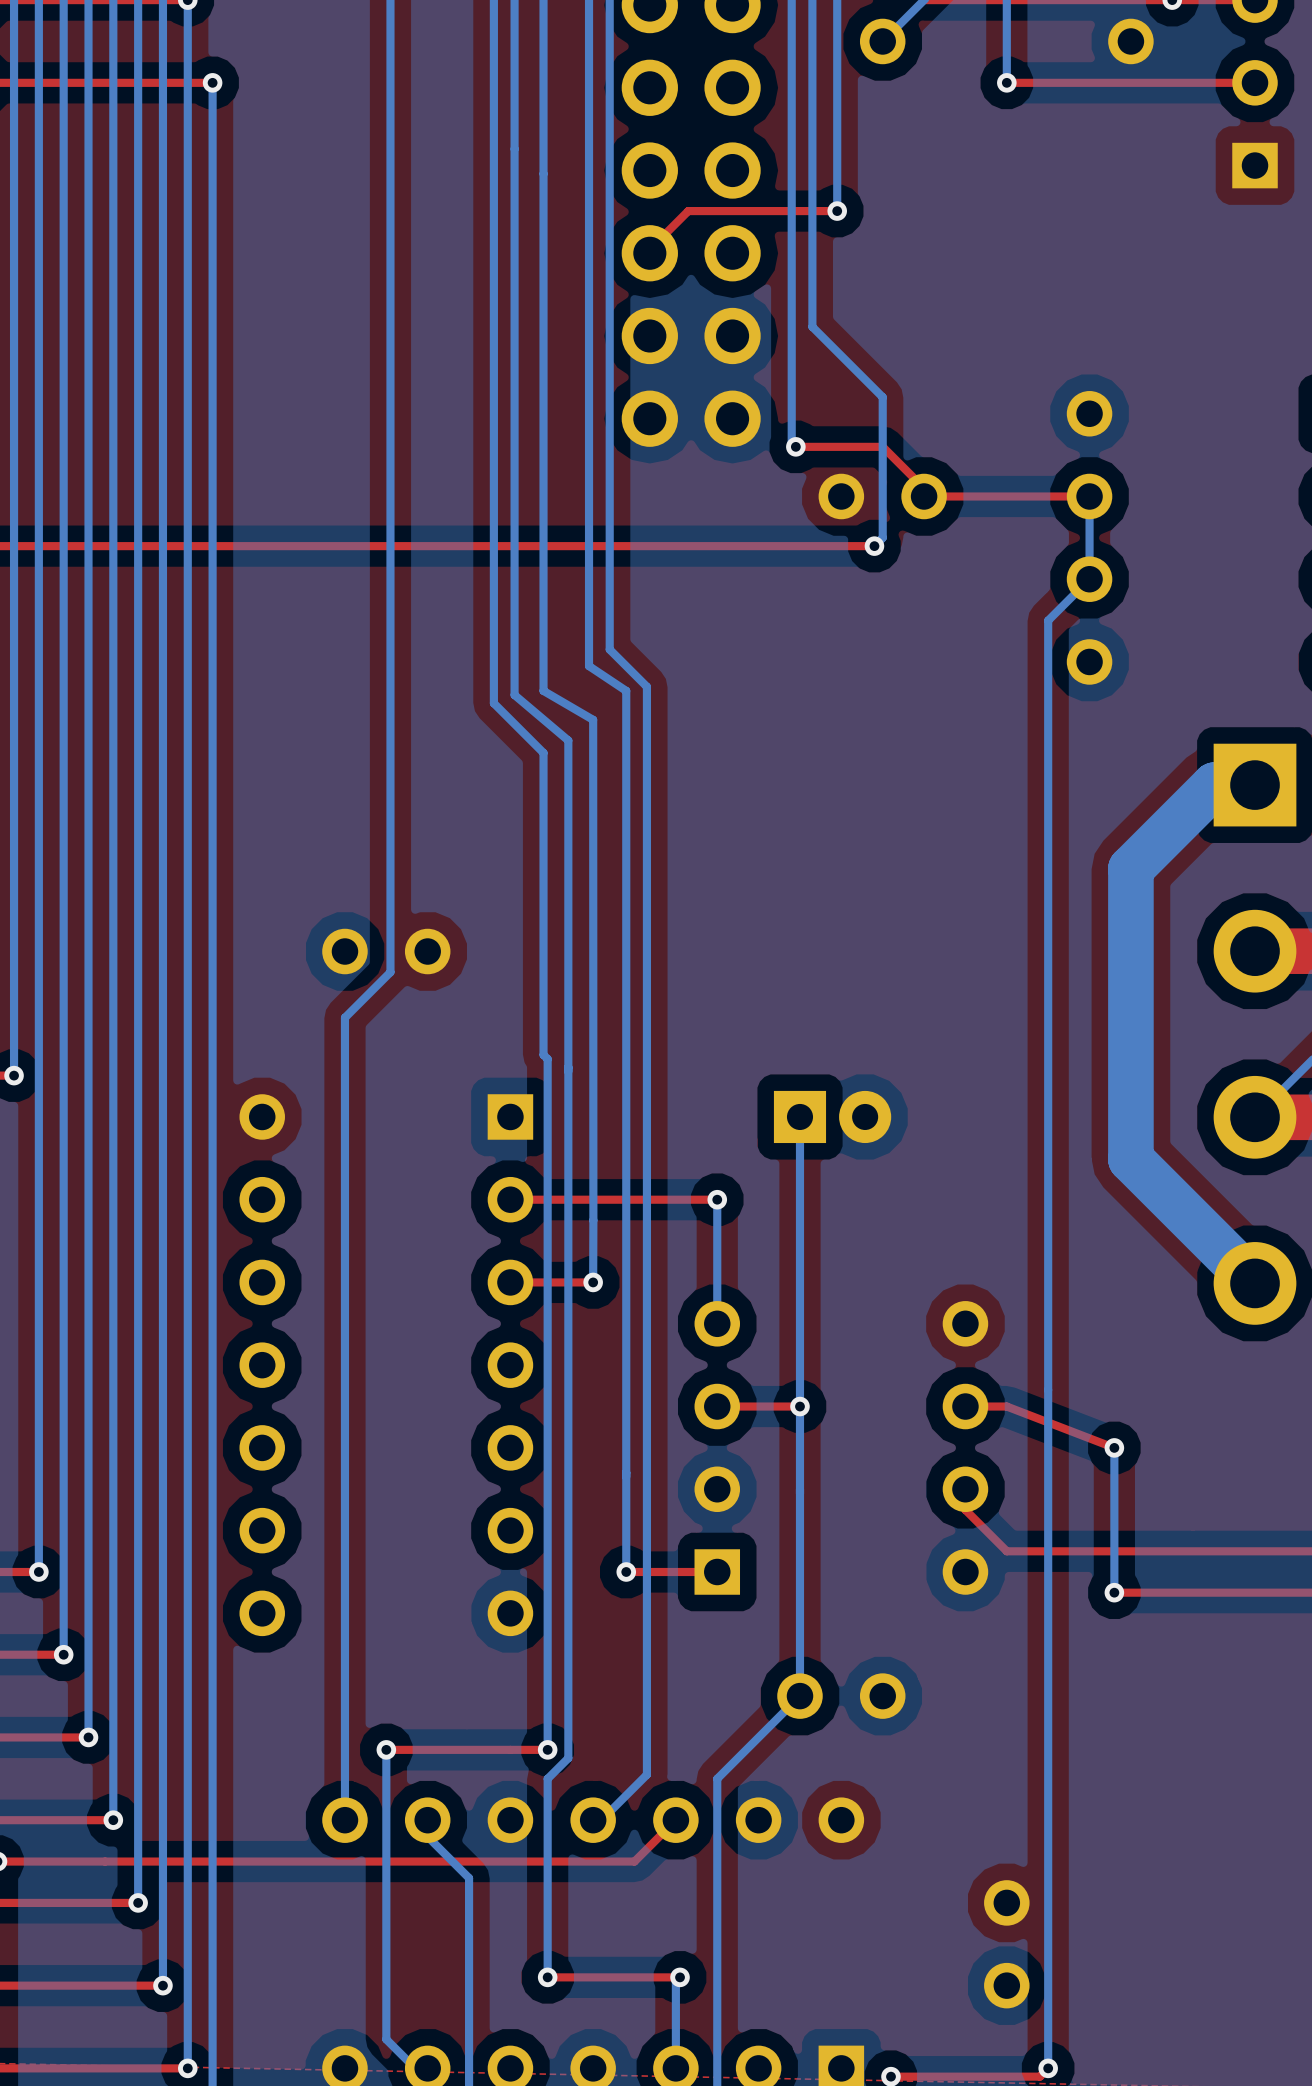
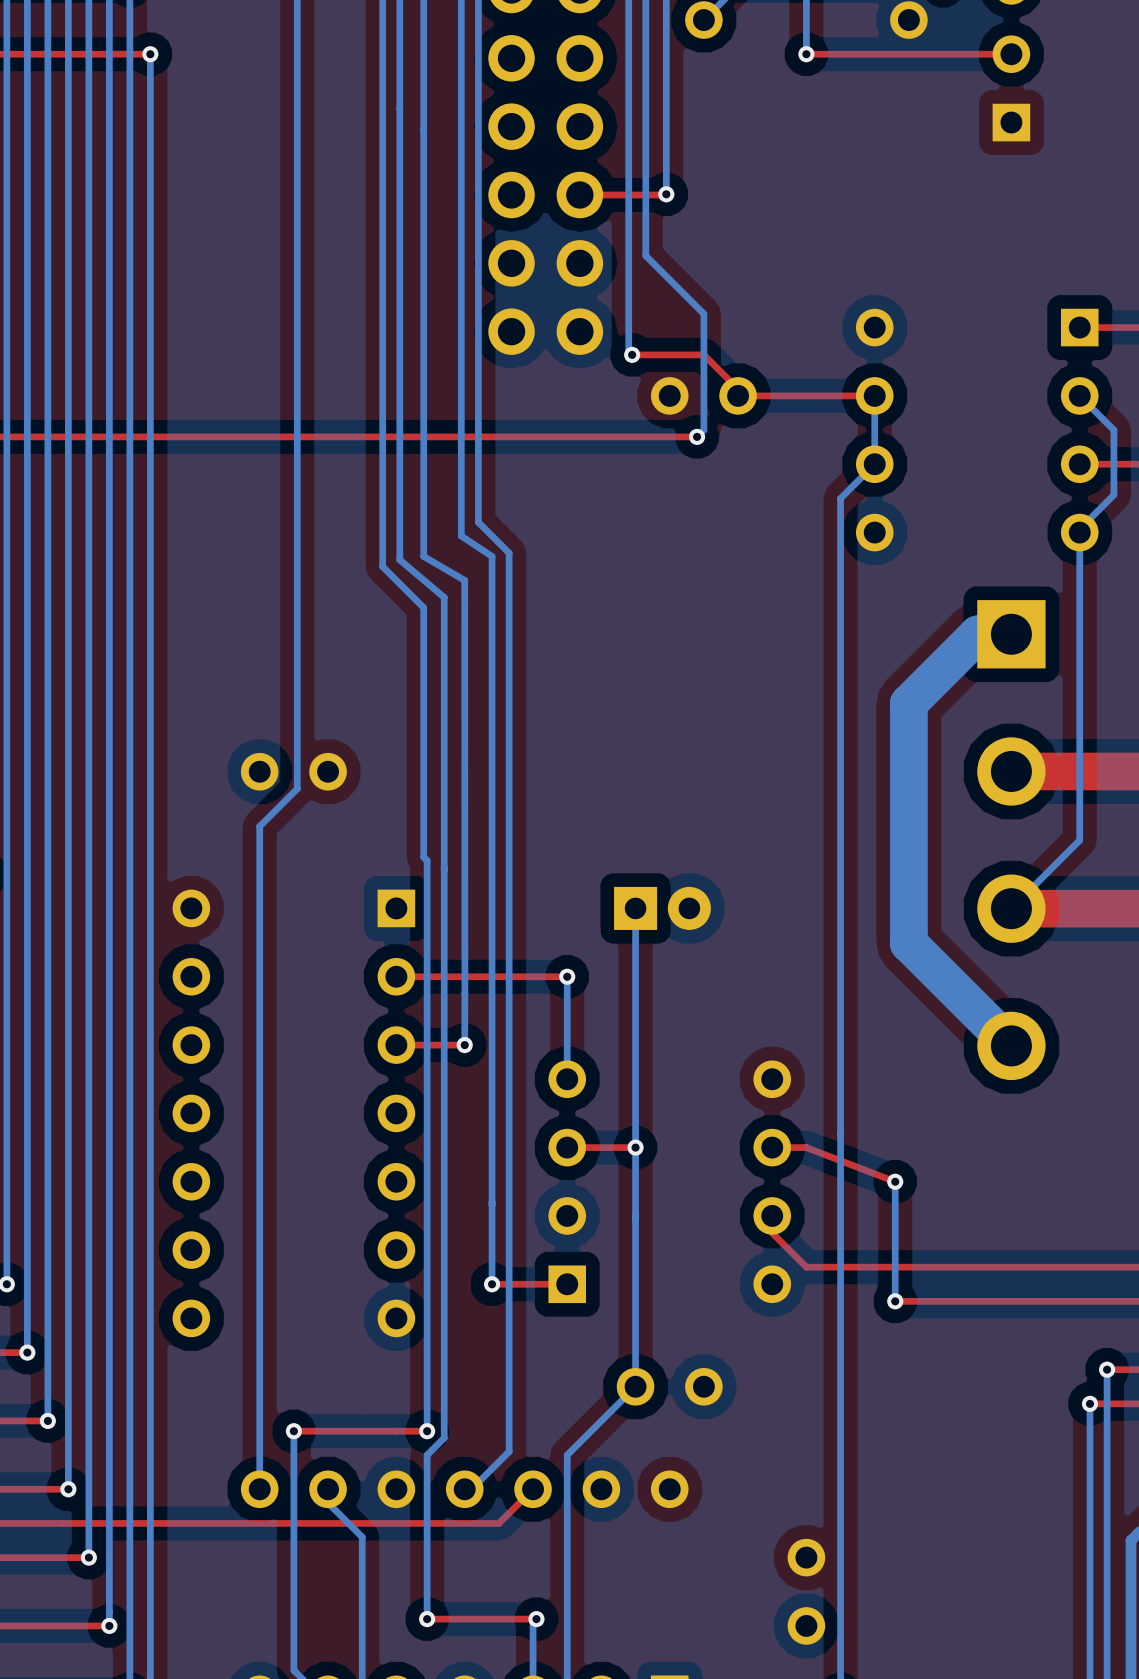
bottom track: none -> (666, 160) (666, 194)
top track: (837, 211) (688, 211) (649, 249) (649, 253) -> none
via position: (837, 211) -> (666, 194)
top track: none -> (666, 194) (579, 194)

